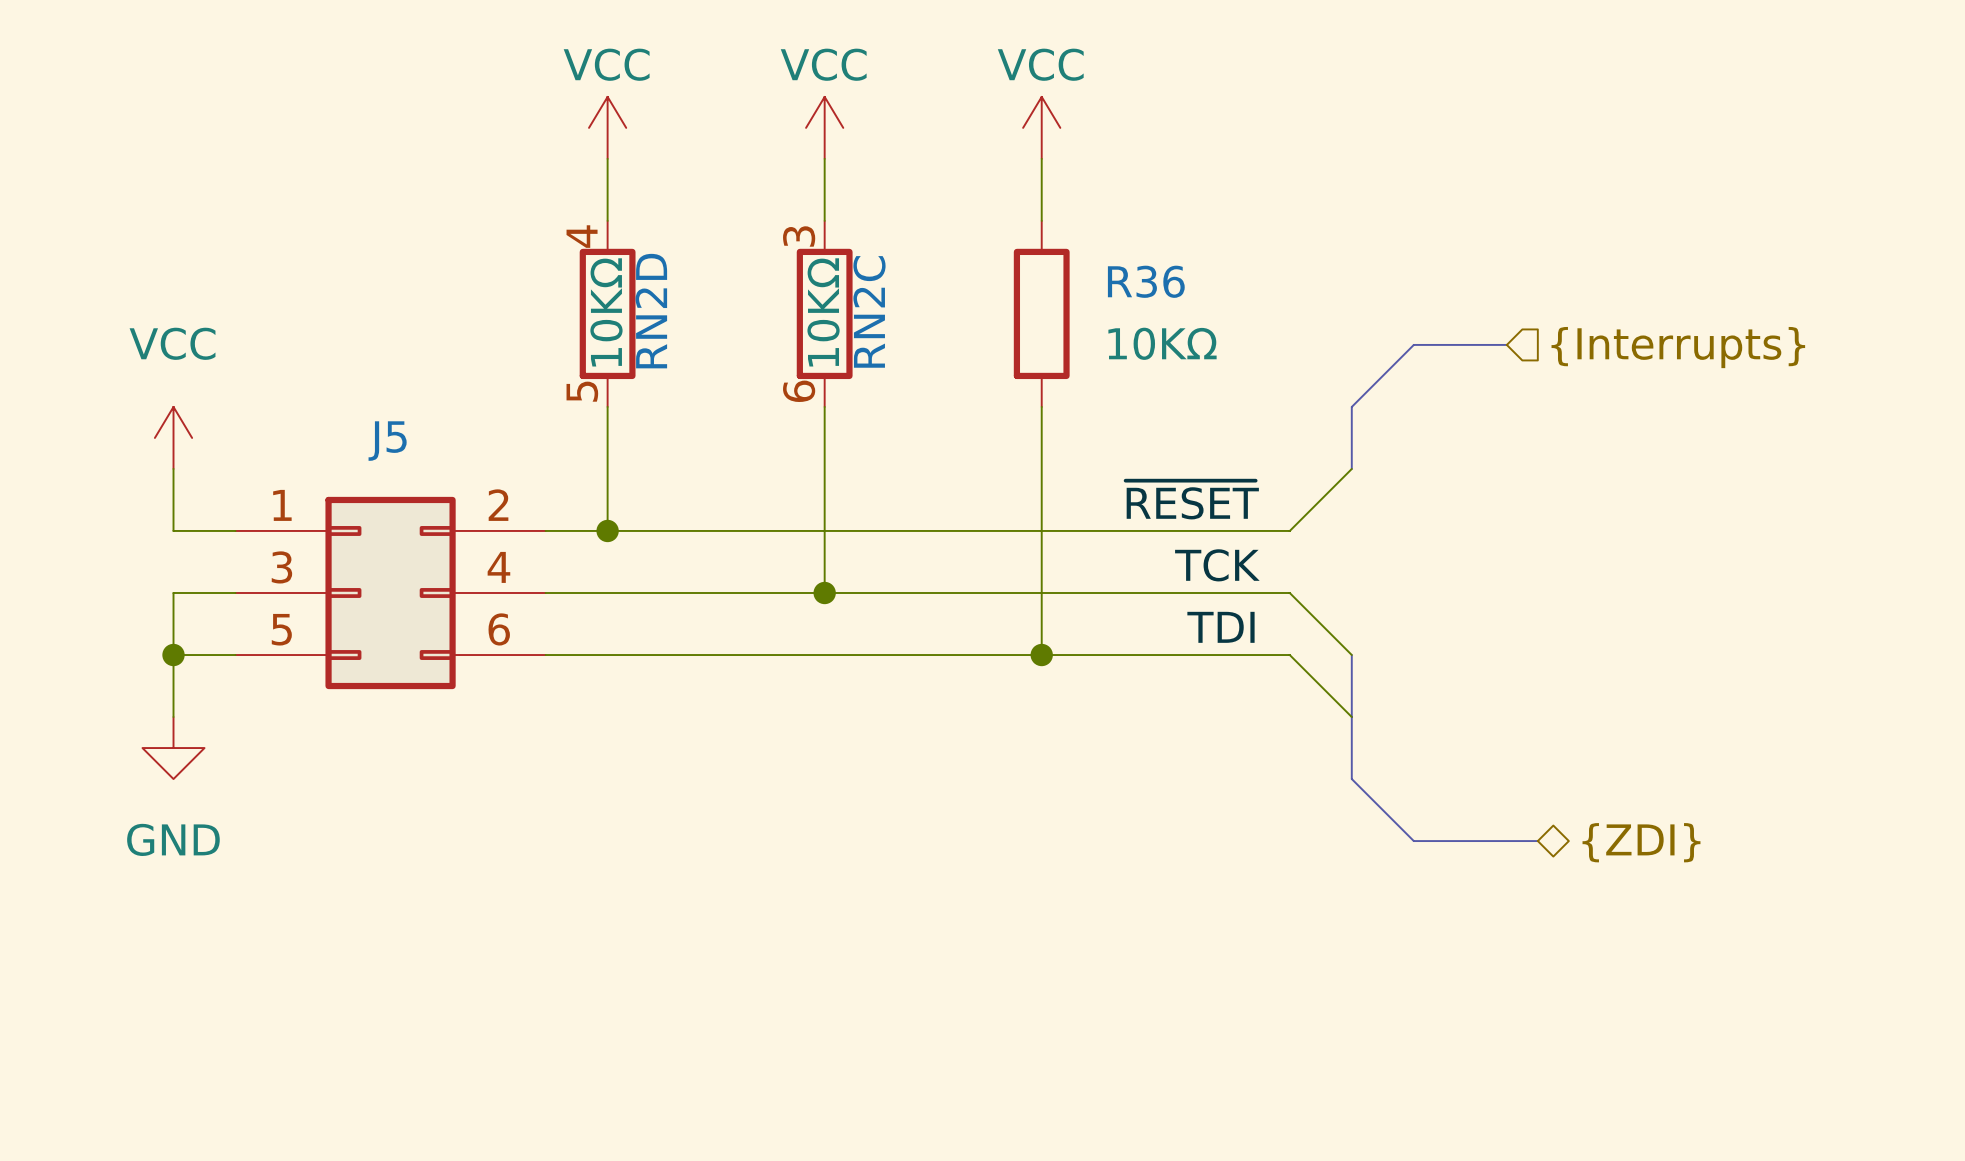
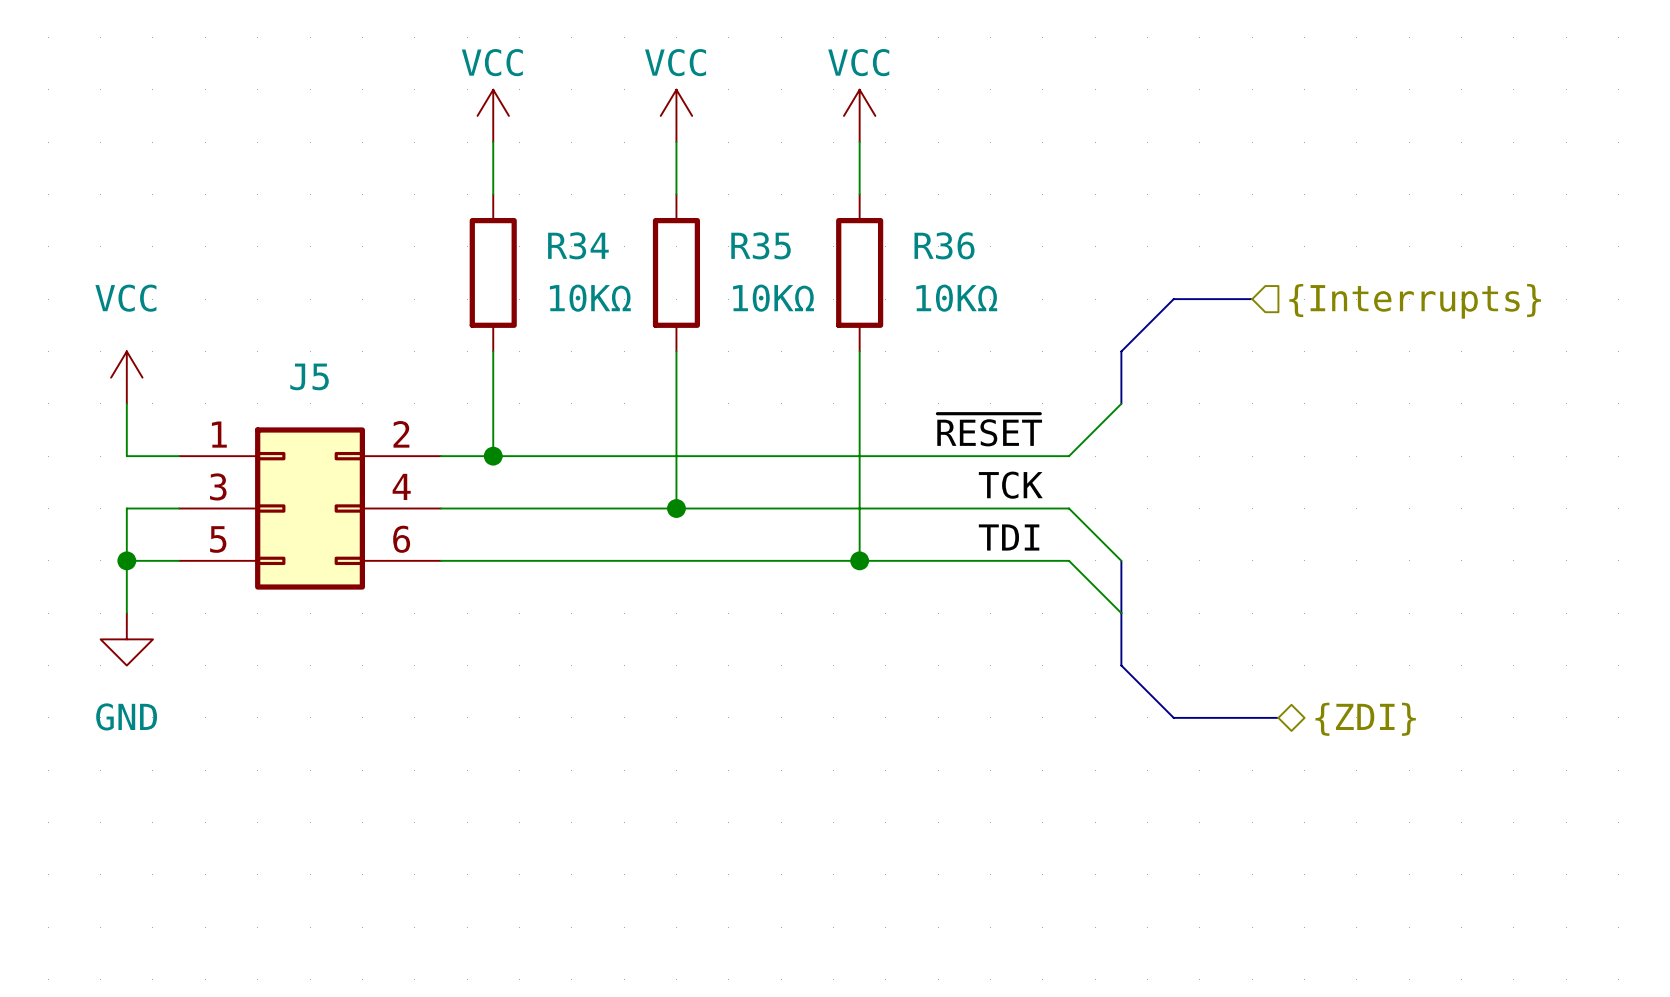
RN2D pin number: 4 (582, 236) -> none
RN2C pin number: 3 (799, 236) -> none
RN2D name: RN2D (651, 311) -> R34 (578, 245)
RN2C name: RN2C (869, 311) -> R35 (761, 245)
RN2D value rotation: 0° (606, 312) -> 90° clockwise (590, 298)
RN2C value rotation: 0° (823, 312) -> 90° clockwise (773, 298)
RN2D pin number: 5 (582, 391) -> none
RN2C pin number: 6 (799, 391) -> none

